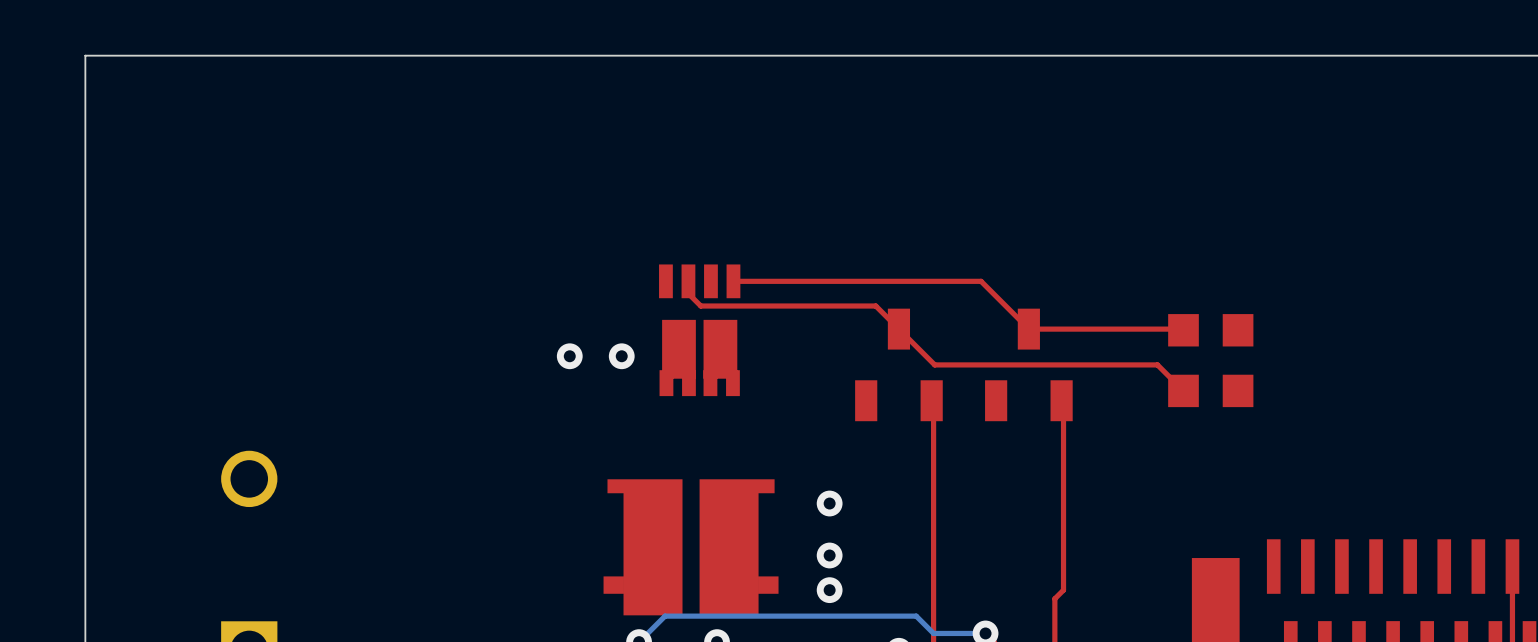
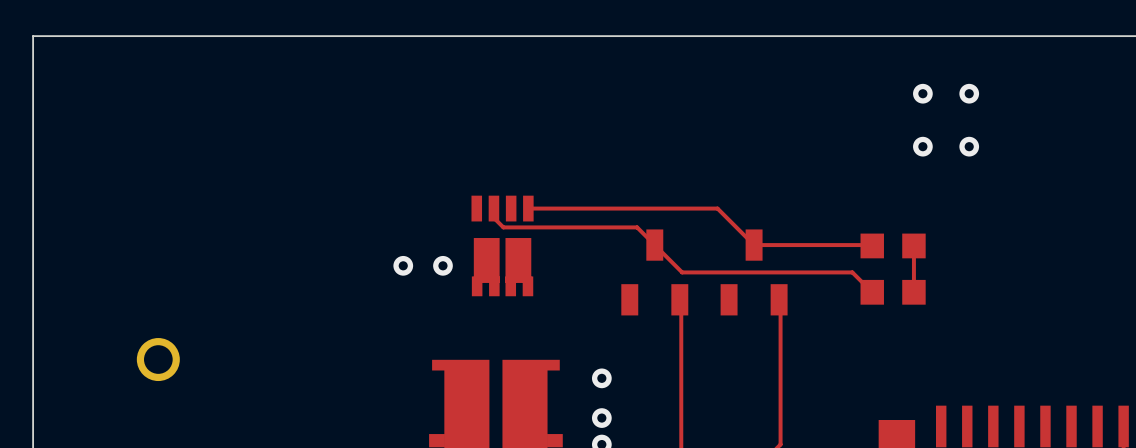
via: none -> (922, 93)
via: none -> (969, 93)
via: none -> (922, 146)
via: none -> (969, 146)
top track: none -> (913, 245) (913, 292)

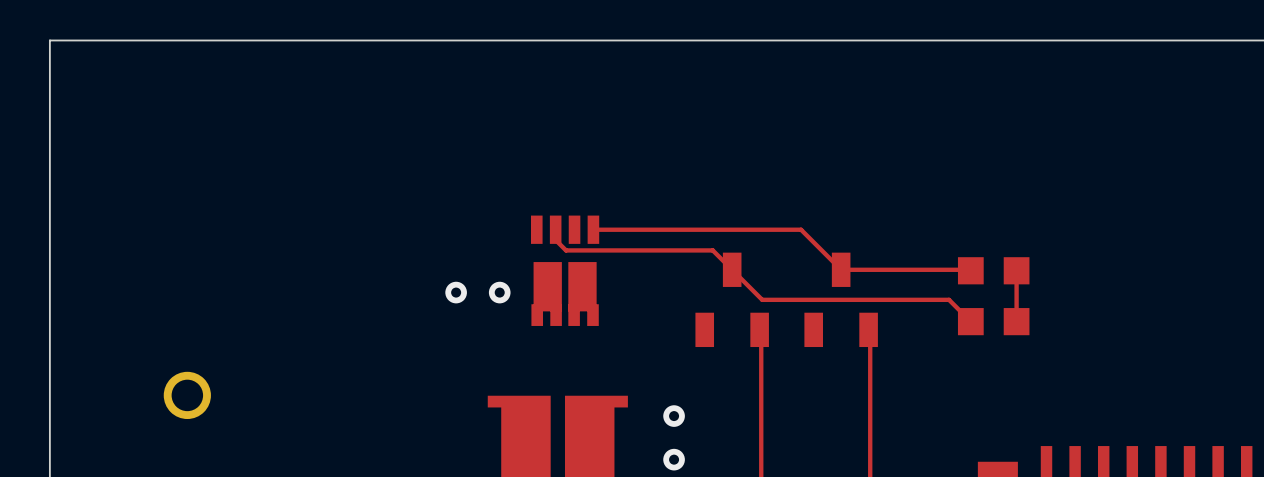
via: (922, 93) -> none
via: (969, 93) -> none
via: (922, 146) -> none
via: (969, 146) -> none

